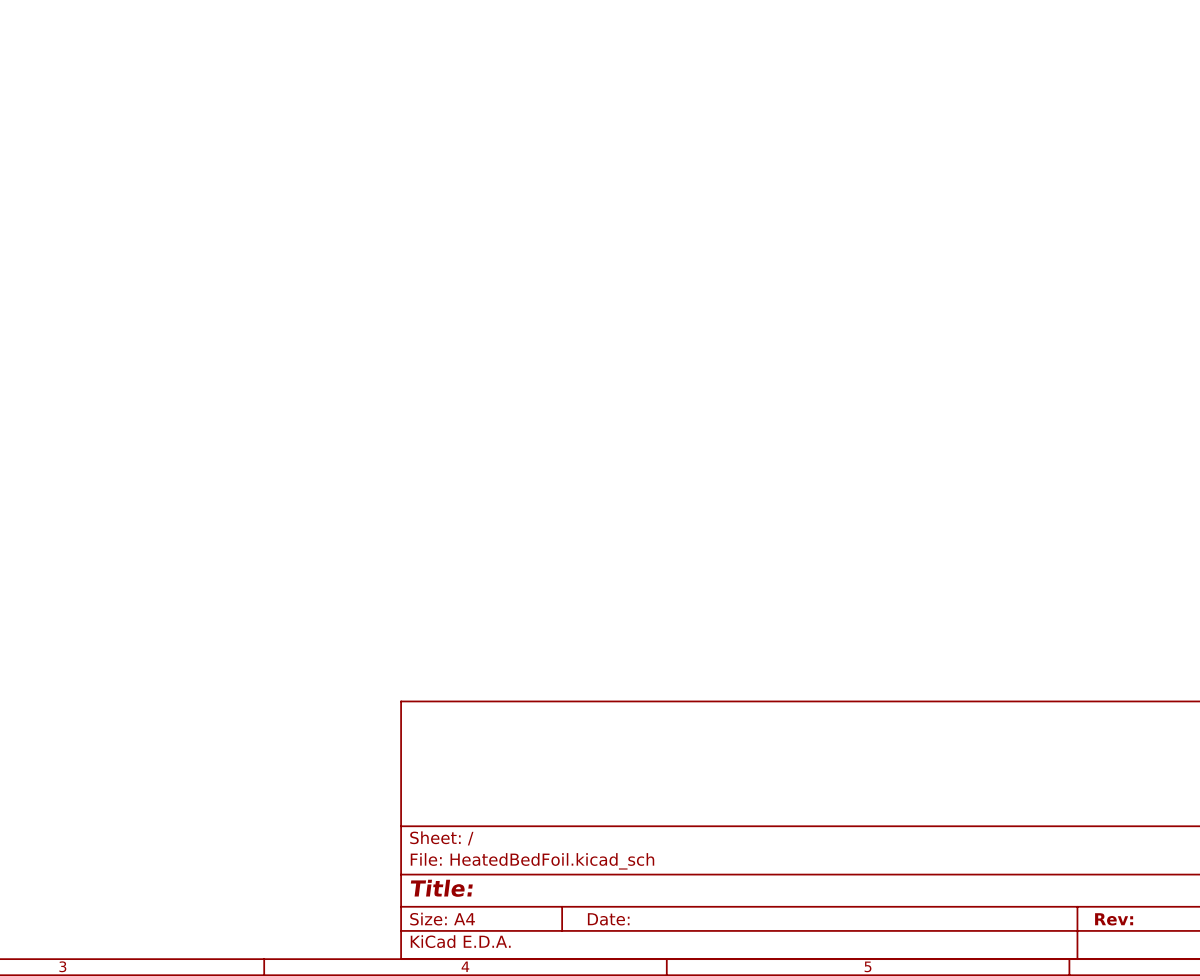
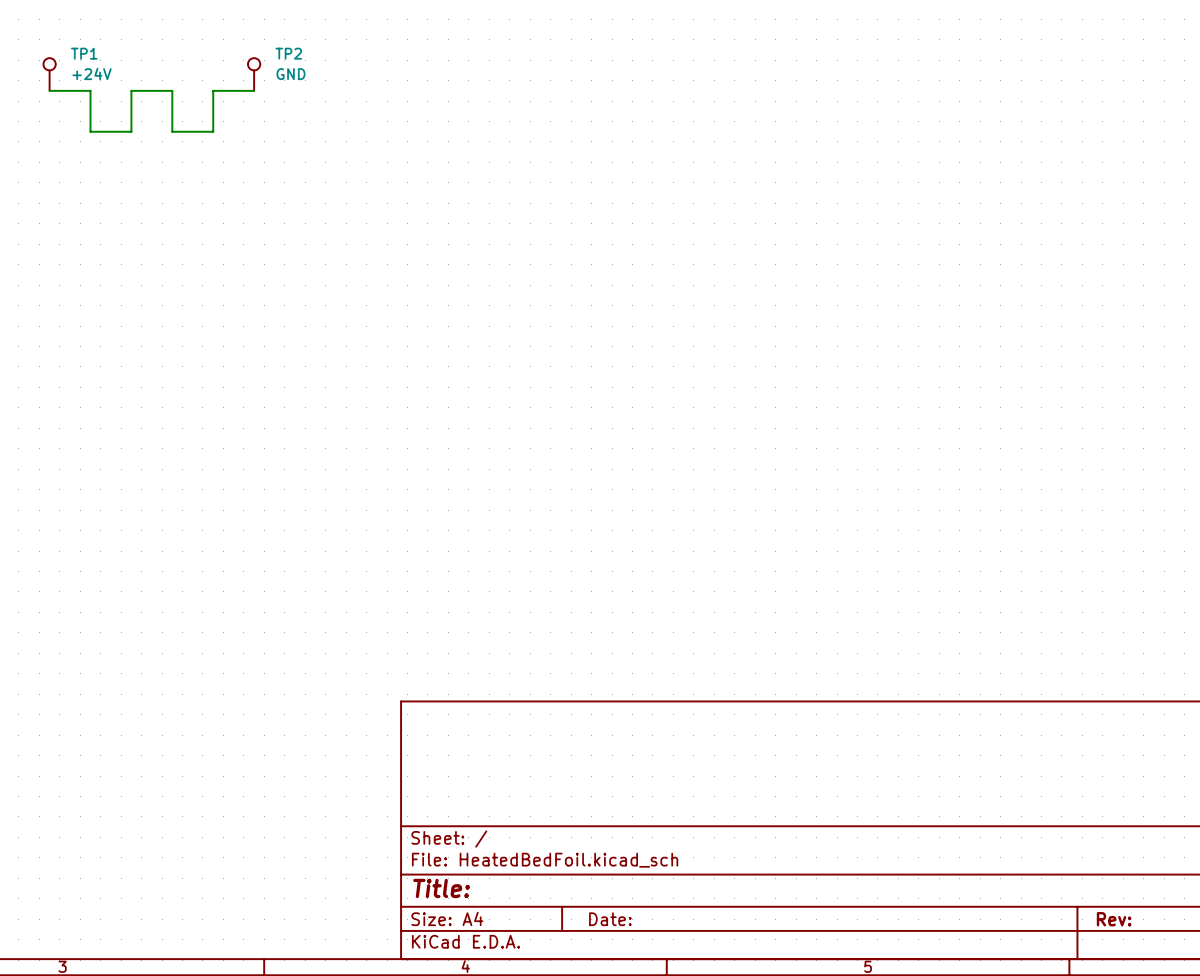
TP1: none -> +24V (49, 74)
TP2: none -> GND (254, 74)
wire: none -> (49, 90) (90, 90) (90, 131) (131, 131) (131, 90) (172, 90) (172, 131) (213, 131) (213, 90) (254, 90)

